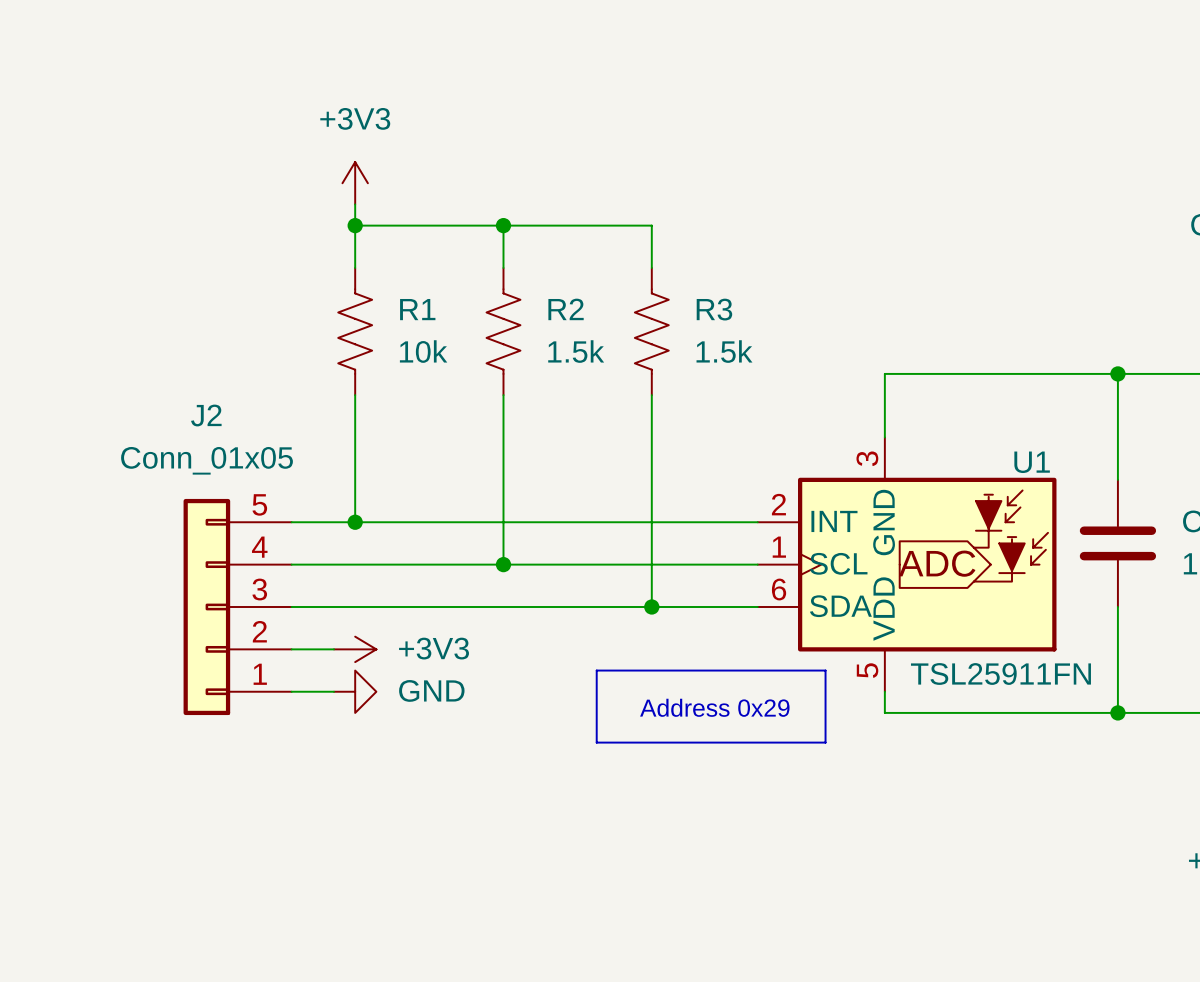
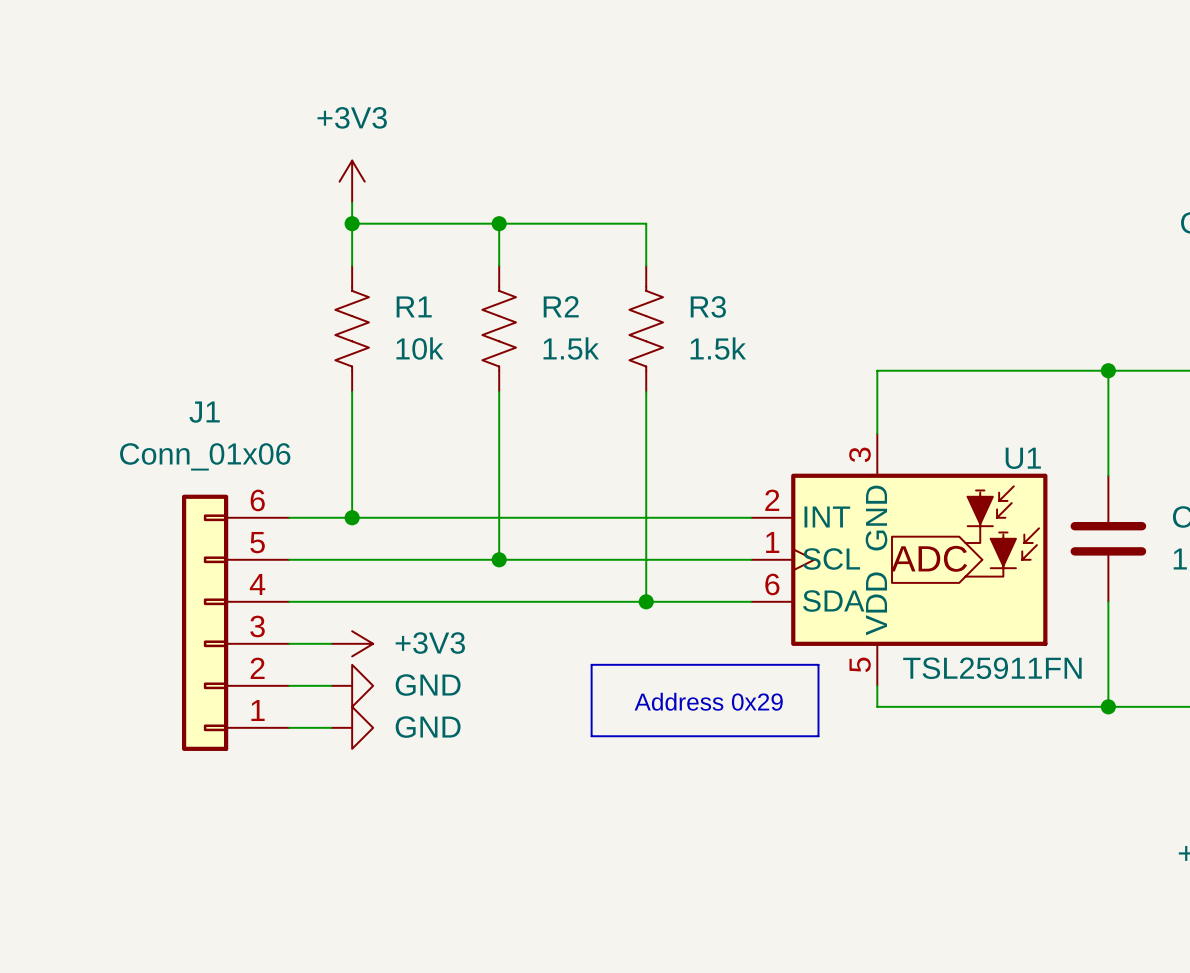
J2: Conn_01x05 (237, 606) -> none
J1: none -> Conn_01x06 (235, 622)
wire: none -> (289, 727) (331, 727)
power symbol: none -> GND (352, 727)

